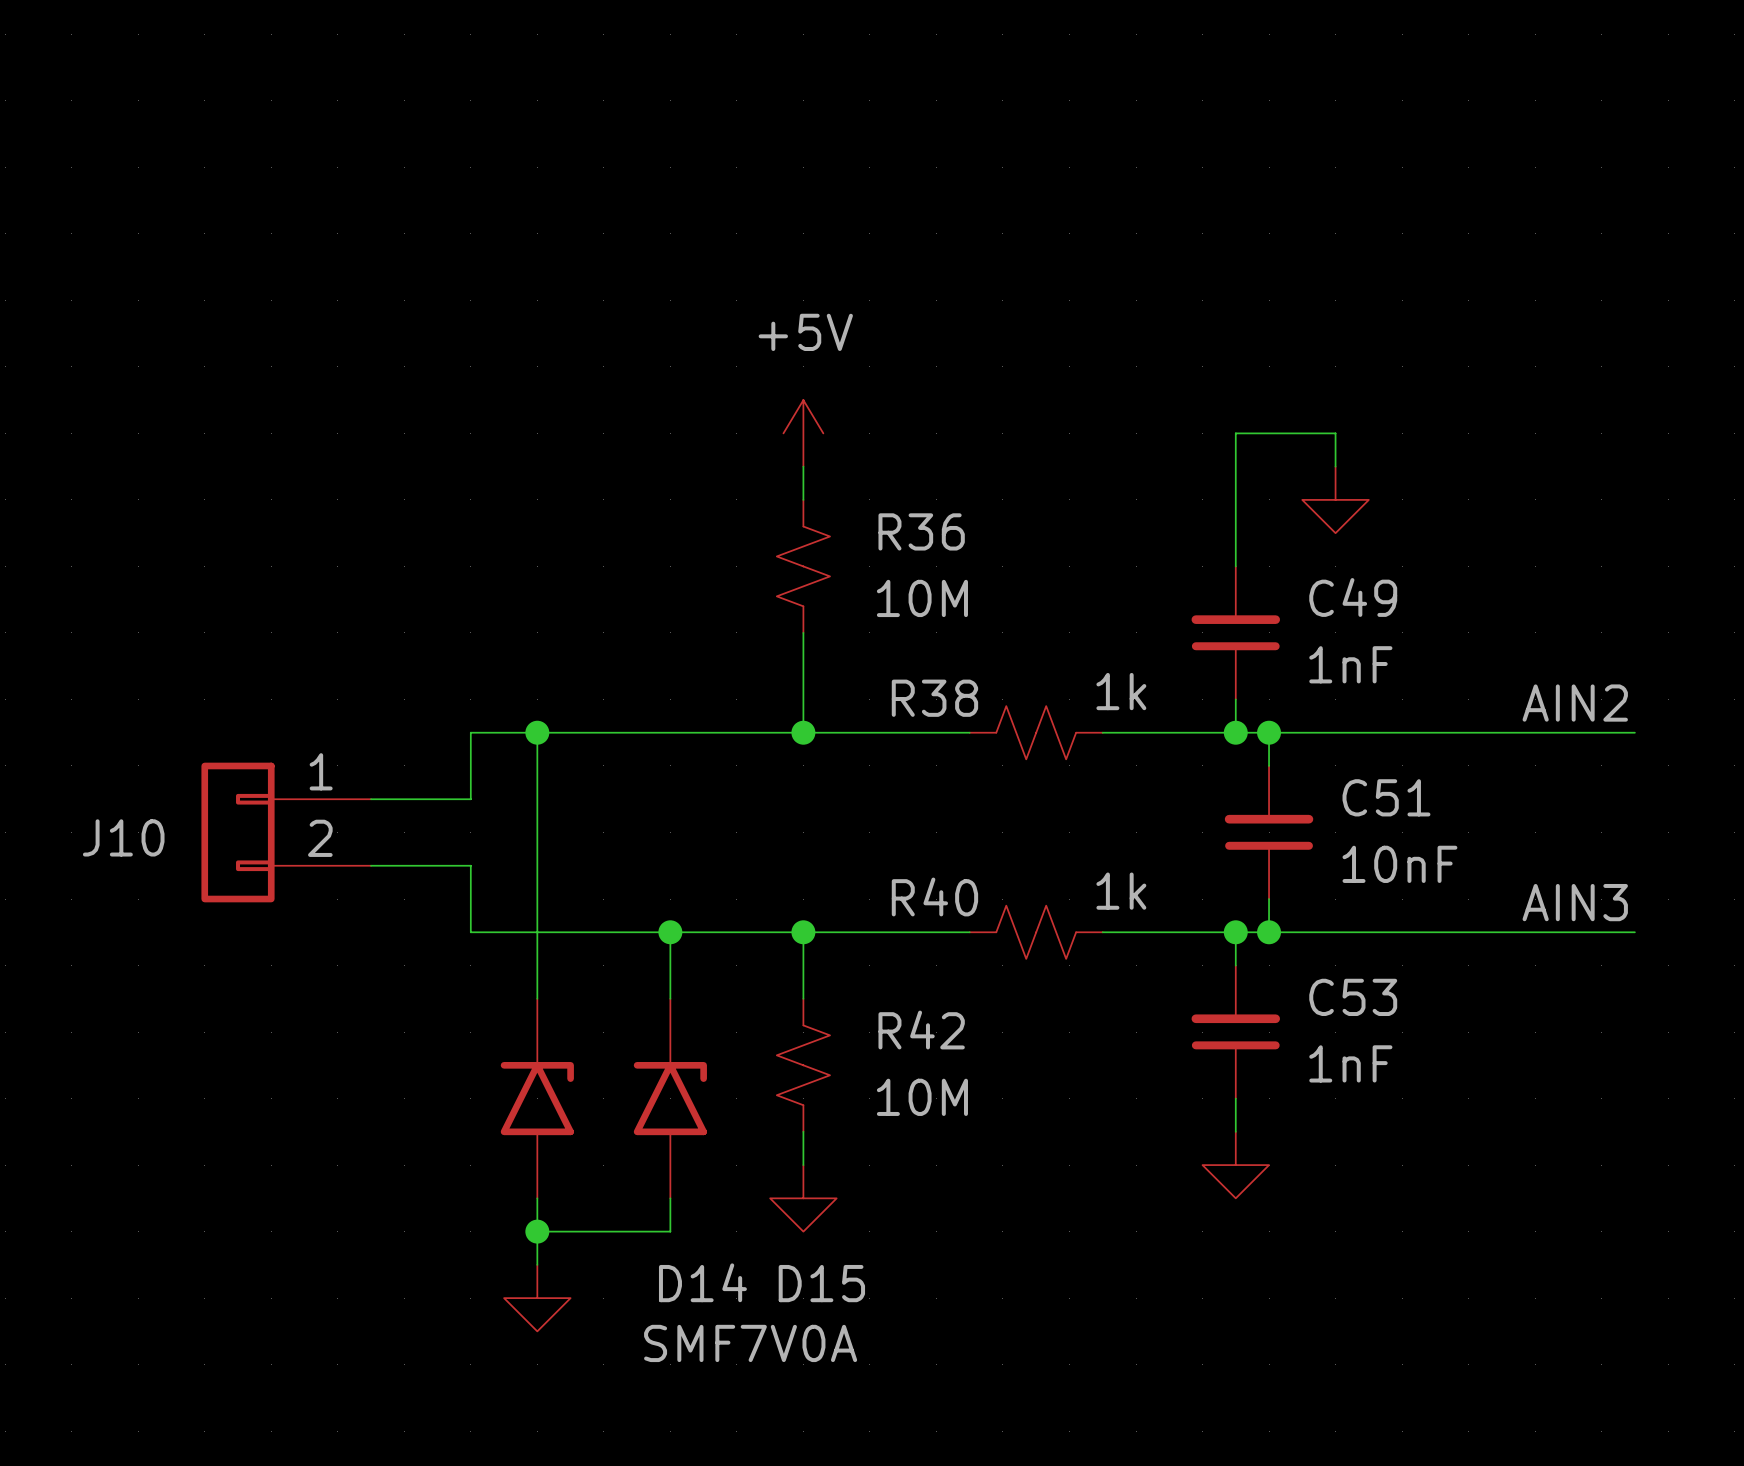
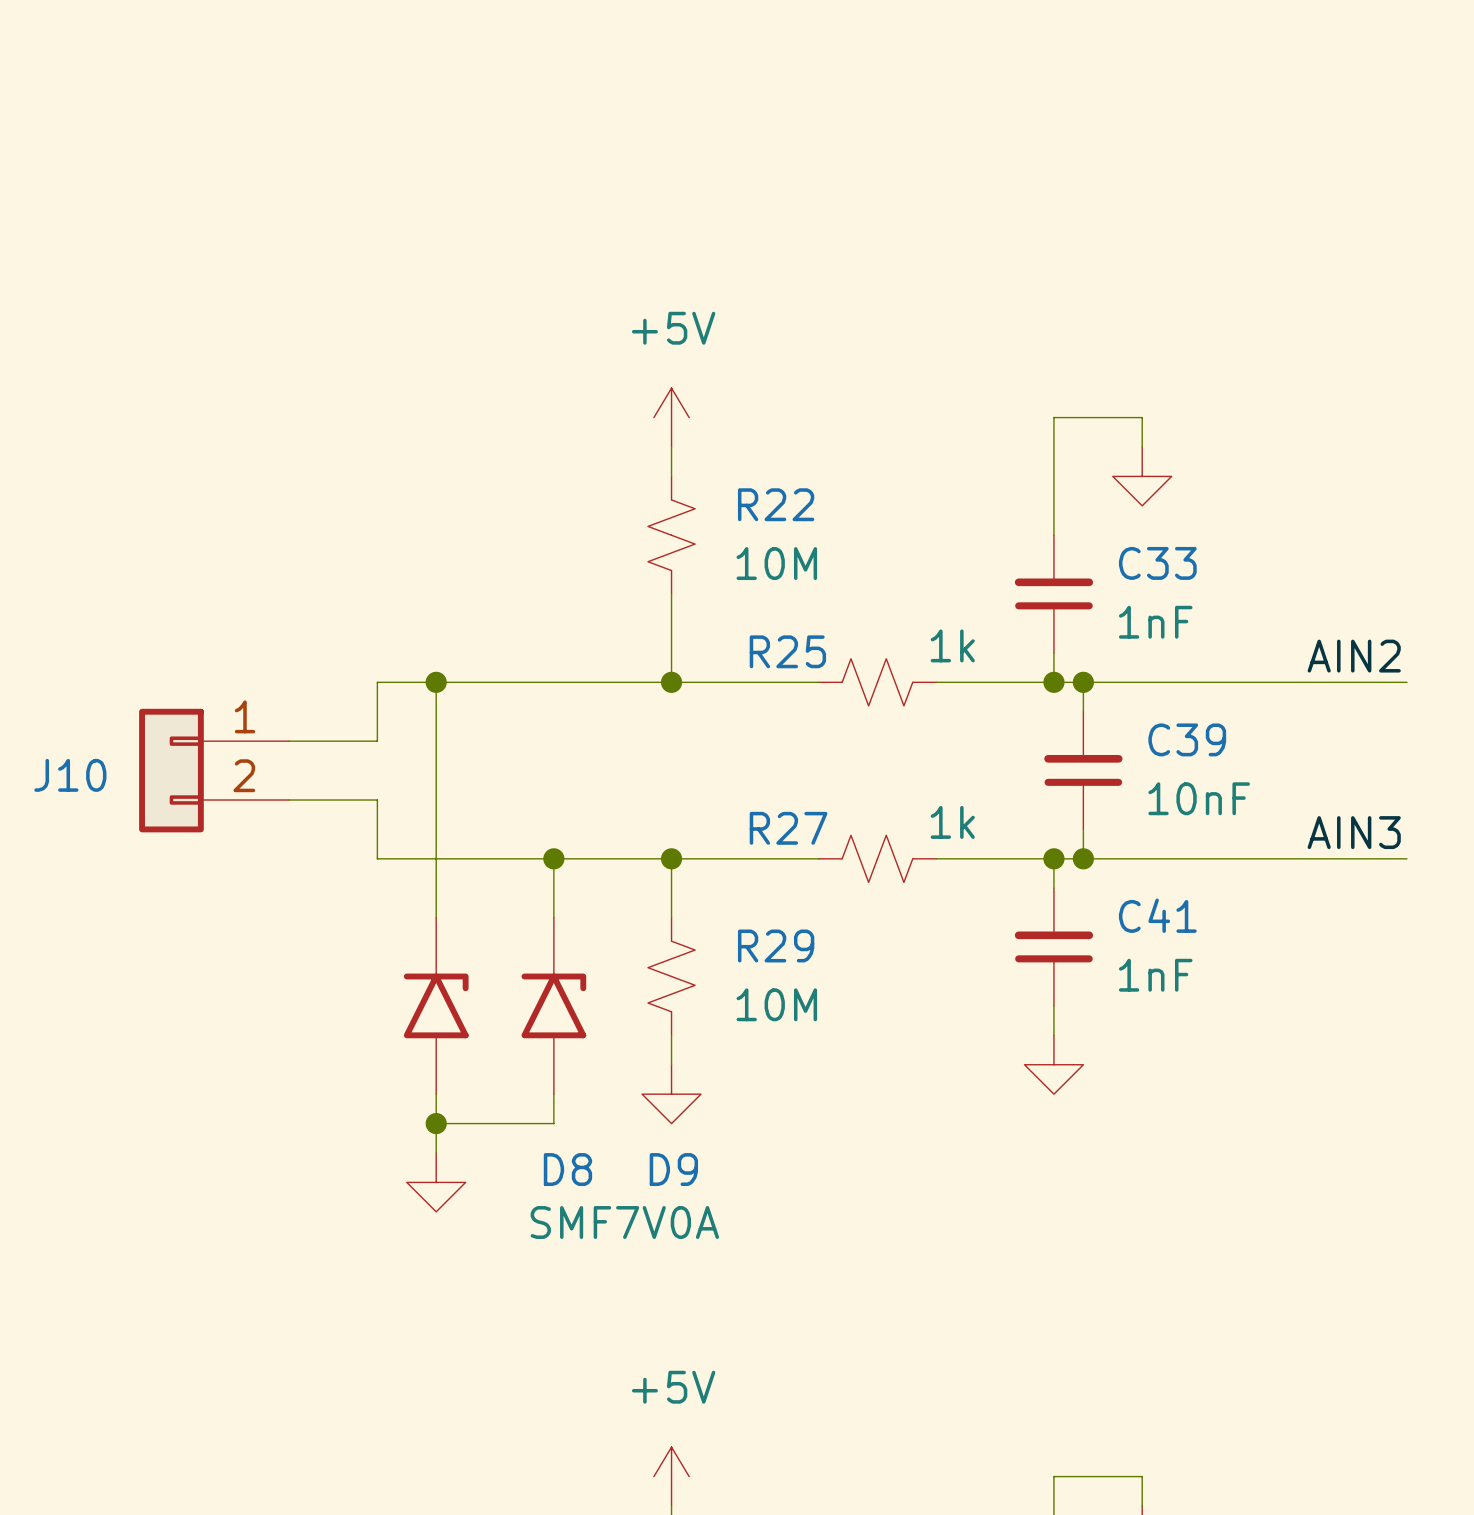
R36 name: R36 (921, 531) -> R22 (776, 504)
C49 name: C49 (1353, 597) -> C33 (1157, 563)
R38 name: R38 (934, 698) -> R25 (787, 651)
C51 name: C51 (1386, 797) -> C39 (1187, 739)
R40 name: R40 (934, 896) -> R27 (788, 828)
C53 name: C53 (1353, 997) -> C41 (1157, 915)
R42 name: R42 (921, 1030) -> R29 (776, 945)
D14 name: D14 (702, 1282) -> D8 (567, 1169)
D15 name: D15 (821, 1283) -> D9 (673, 1169)

